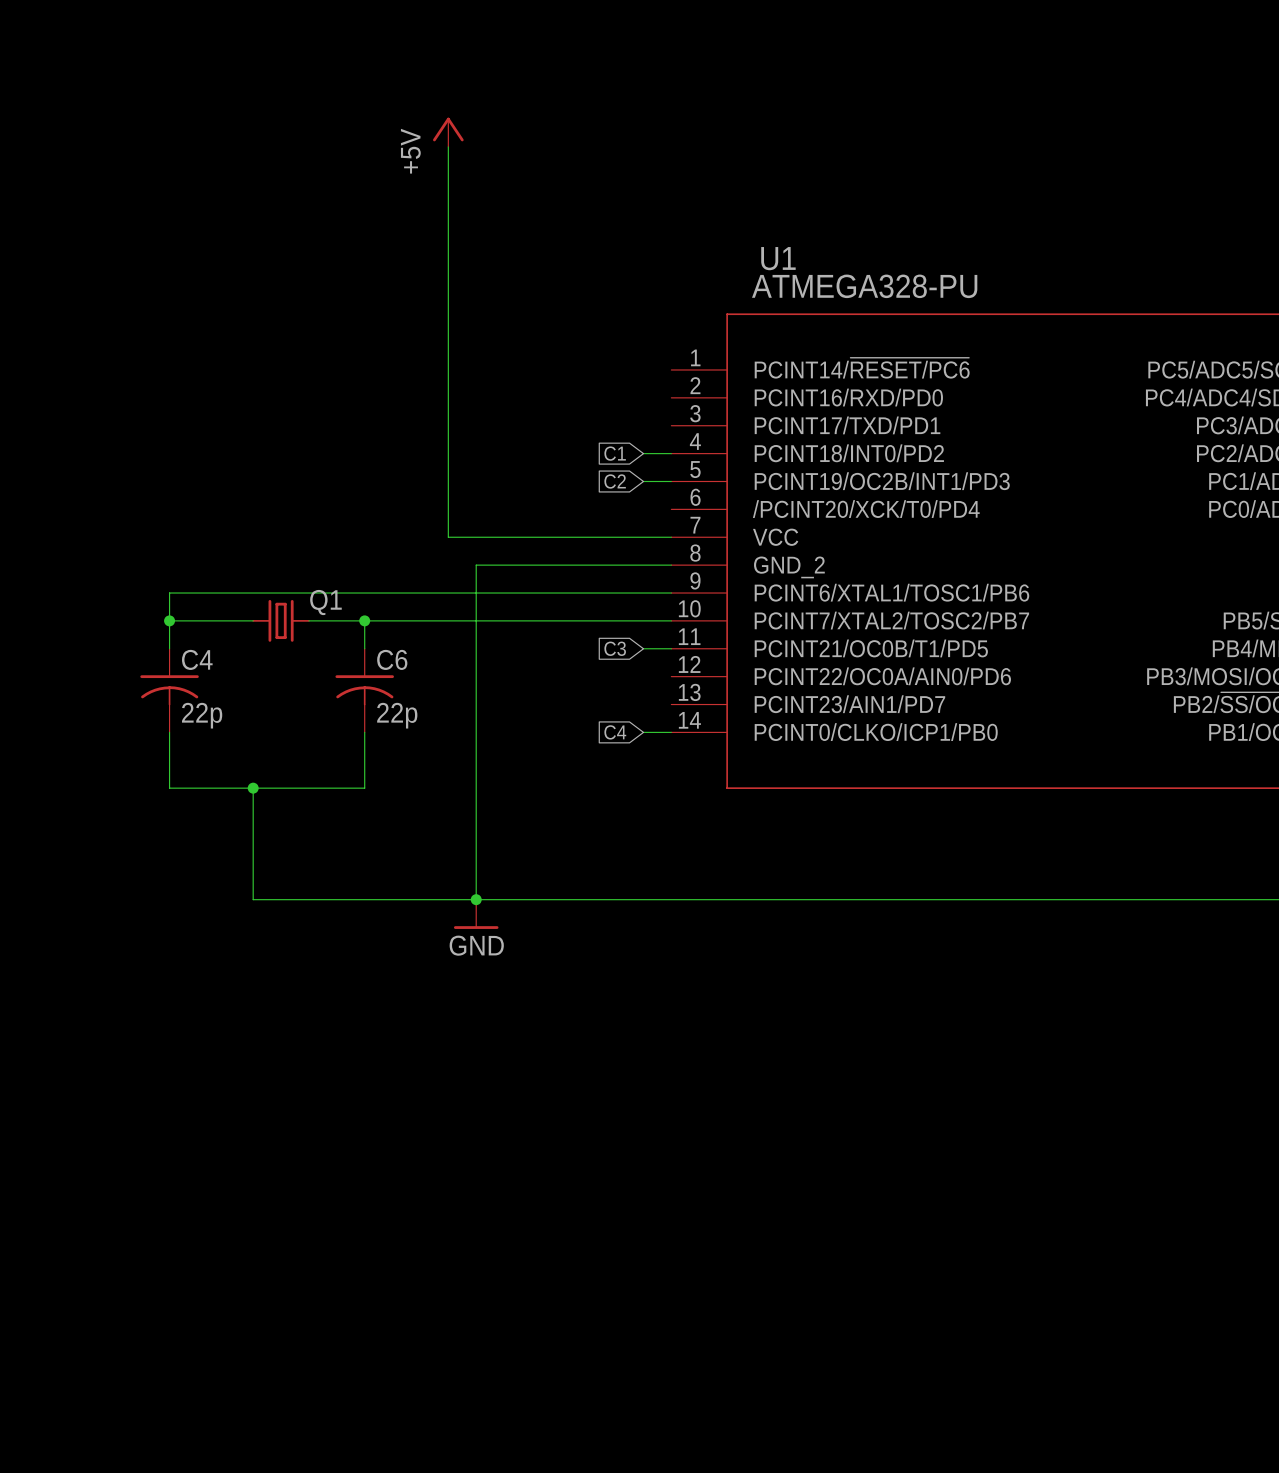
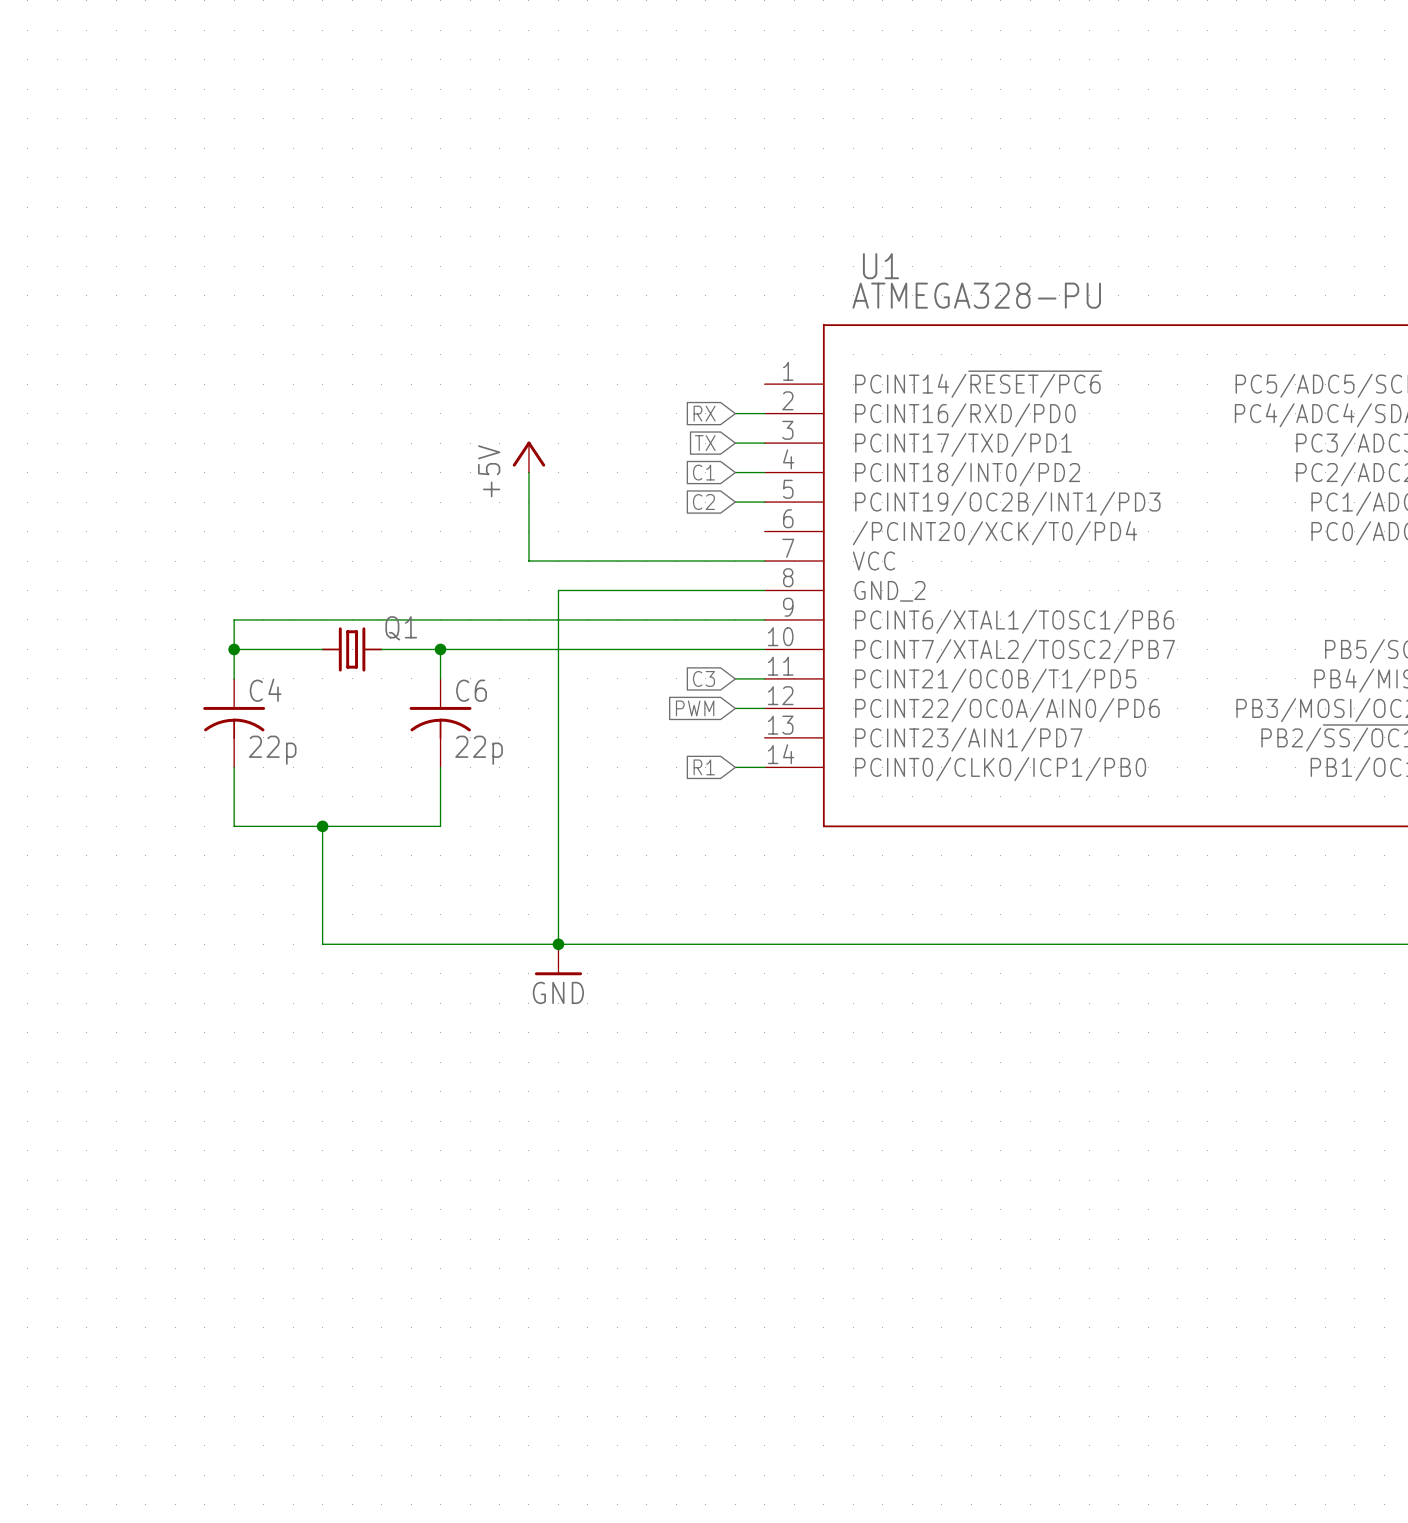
power symbol: +5V (448, 132) -> none
wire: (448, 146) (448, 453) -> none
global label: none -> RX (704, 413)
wire: none -> (735, 413) (764, 413)
global label: none -> TX (705, 443)
wire: none -> (735, 443) (764, 443)
power symbol: none -> +5V (528, 457)
global label: none -> PWM (695, 708)
wire: none -> (735, 708) (764, 708)
global label: C4 (615, 732) -> R1 (704, 767)

